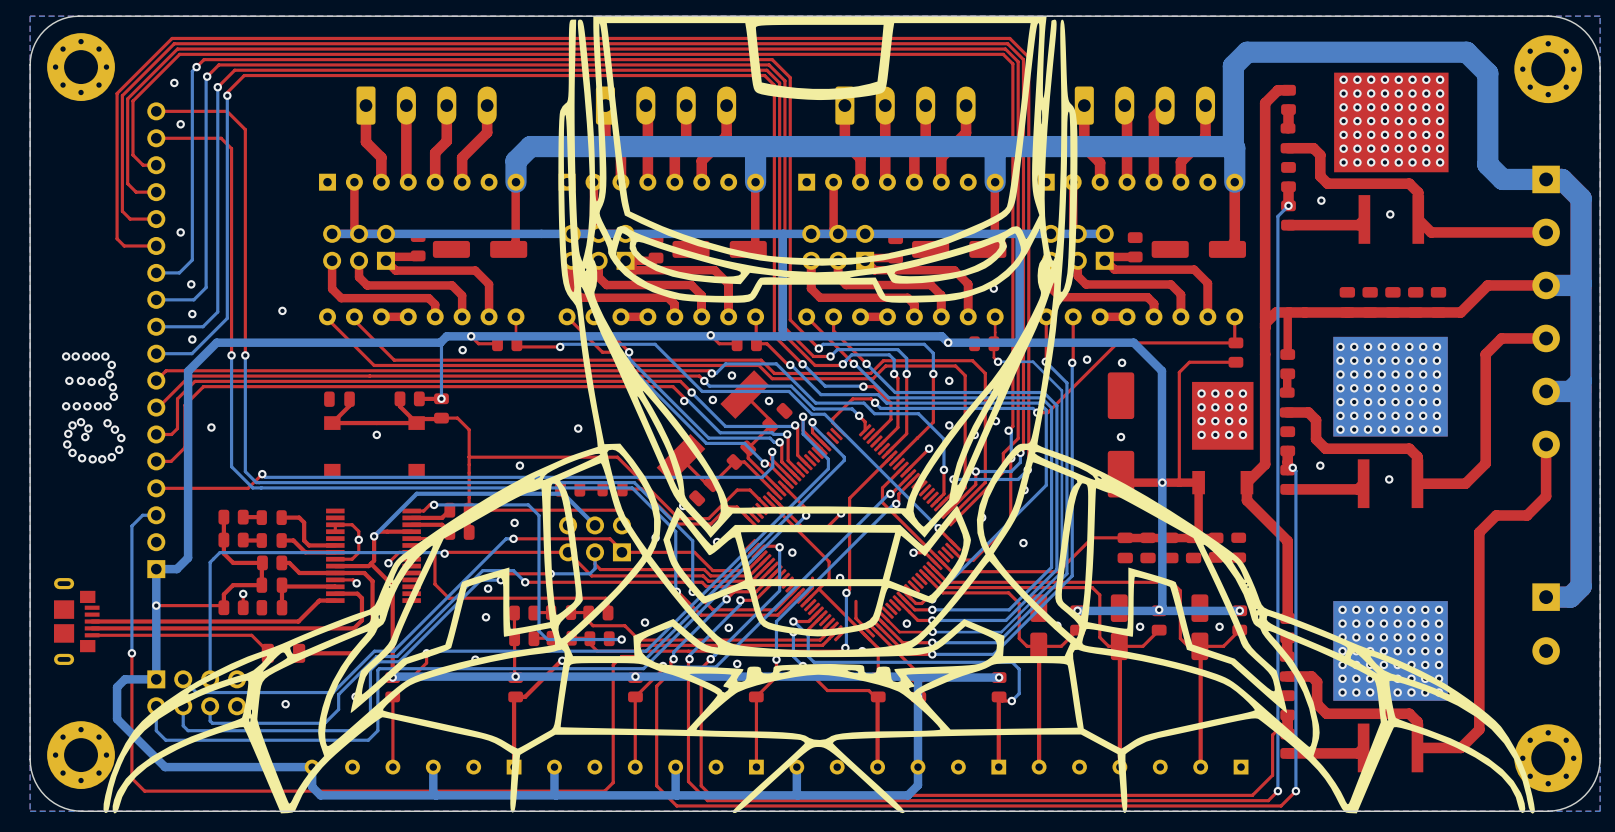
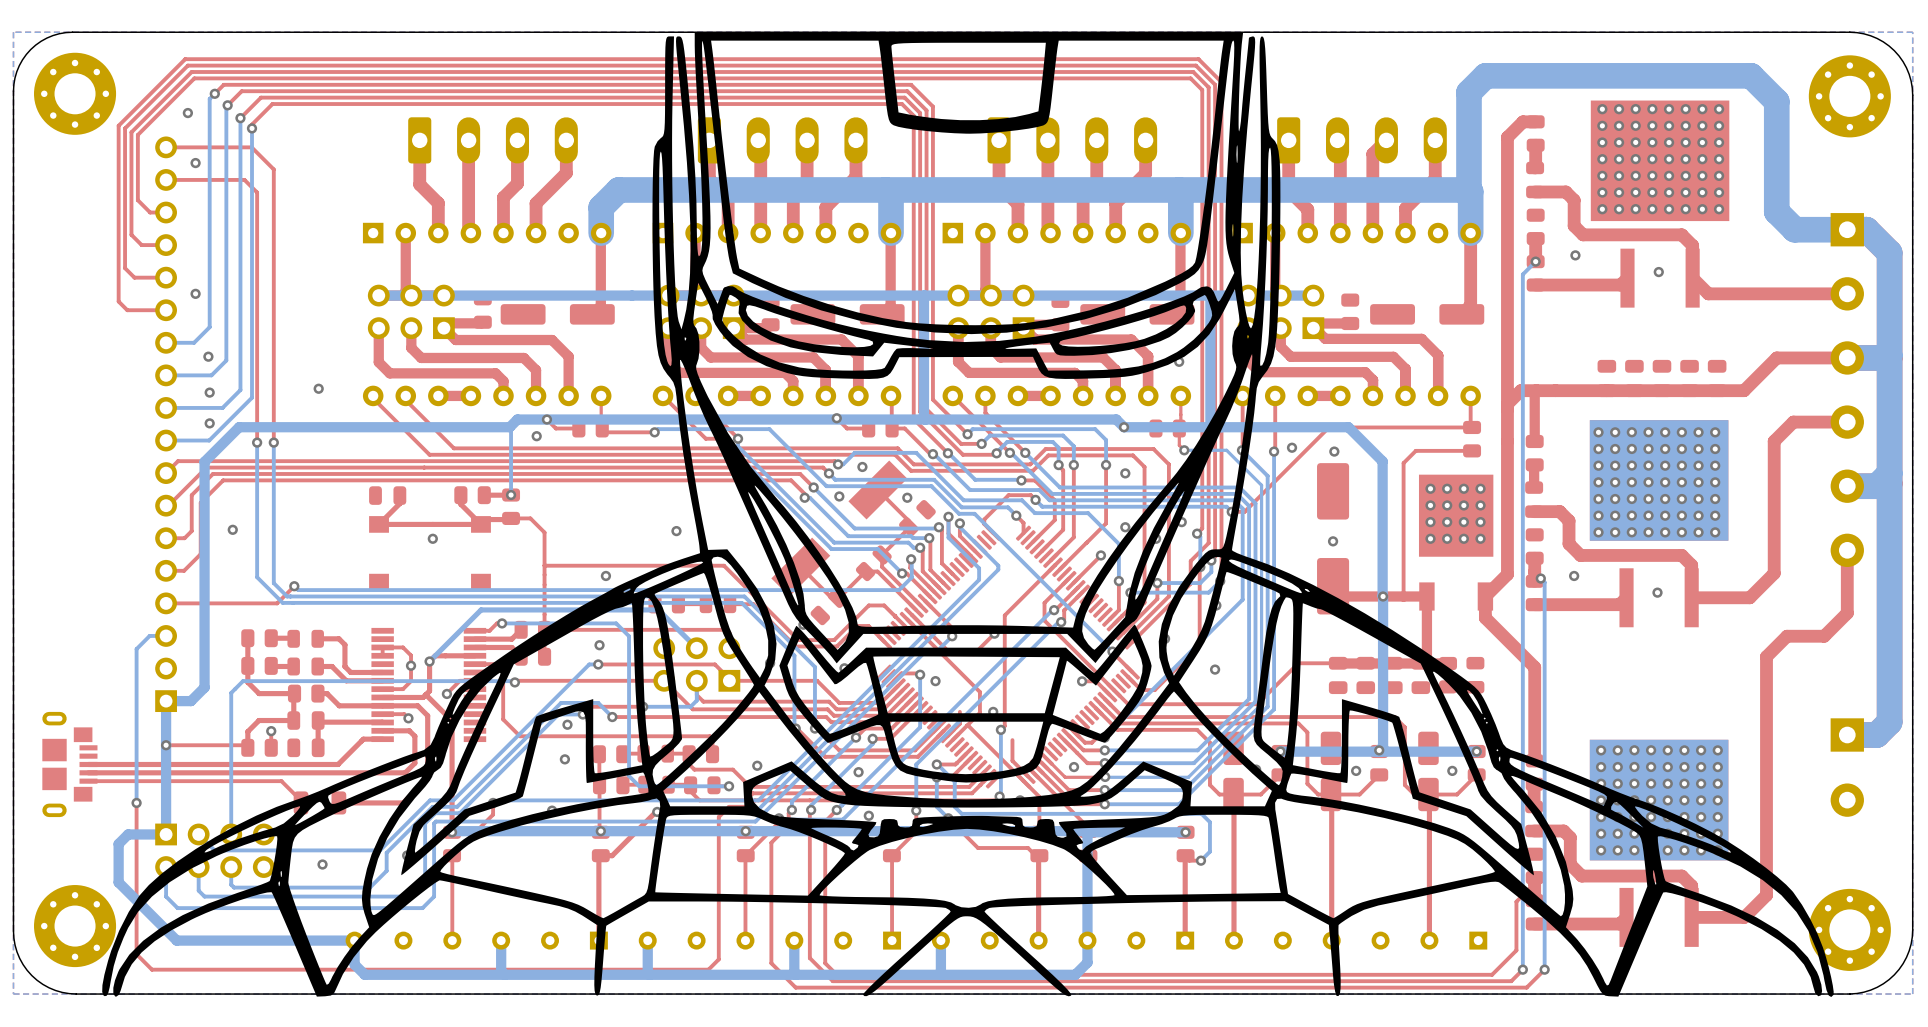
via: (66, 356) -> none
via: (75, 356) -> none
via: (86, 356) -> none
via: (95, 356) -> none
via: (105, 356) -> none
via: (111, 364) -> none
via: (109, 374) -> none
via: (69, 380) -> none
via: (81, 380) -> none
via: (91, 381) -> none
via: (102, 381) -> none
via: (112, 387) -> none
via: (113, 396) -> none
via: (66, 406) -> none
via: (76, 406) -> none
via: (87, 406) -> none
via: (97, 406) -> none
via: (107, 406) -> none
via: (81, 422) -> none
via: (107, 423) -> none
via: (72, 425) -> none
via: (88, 428) -> none
via: (114, 429) -> none
via: (68, 433) -> none
via: (85, 437) -> none
via: (121, 438) -> none
via: (67, 444) -> none
via: (119, 449) -> none
via: (72, 452) -> none
via: (111, 457) -> none
via: (82, 458) -> none
via: (92, 459) -> none
via: (102, 459) -> none

